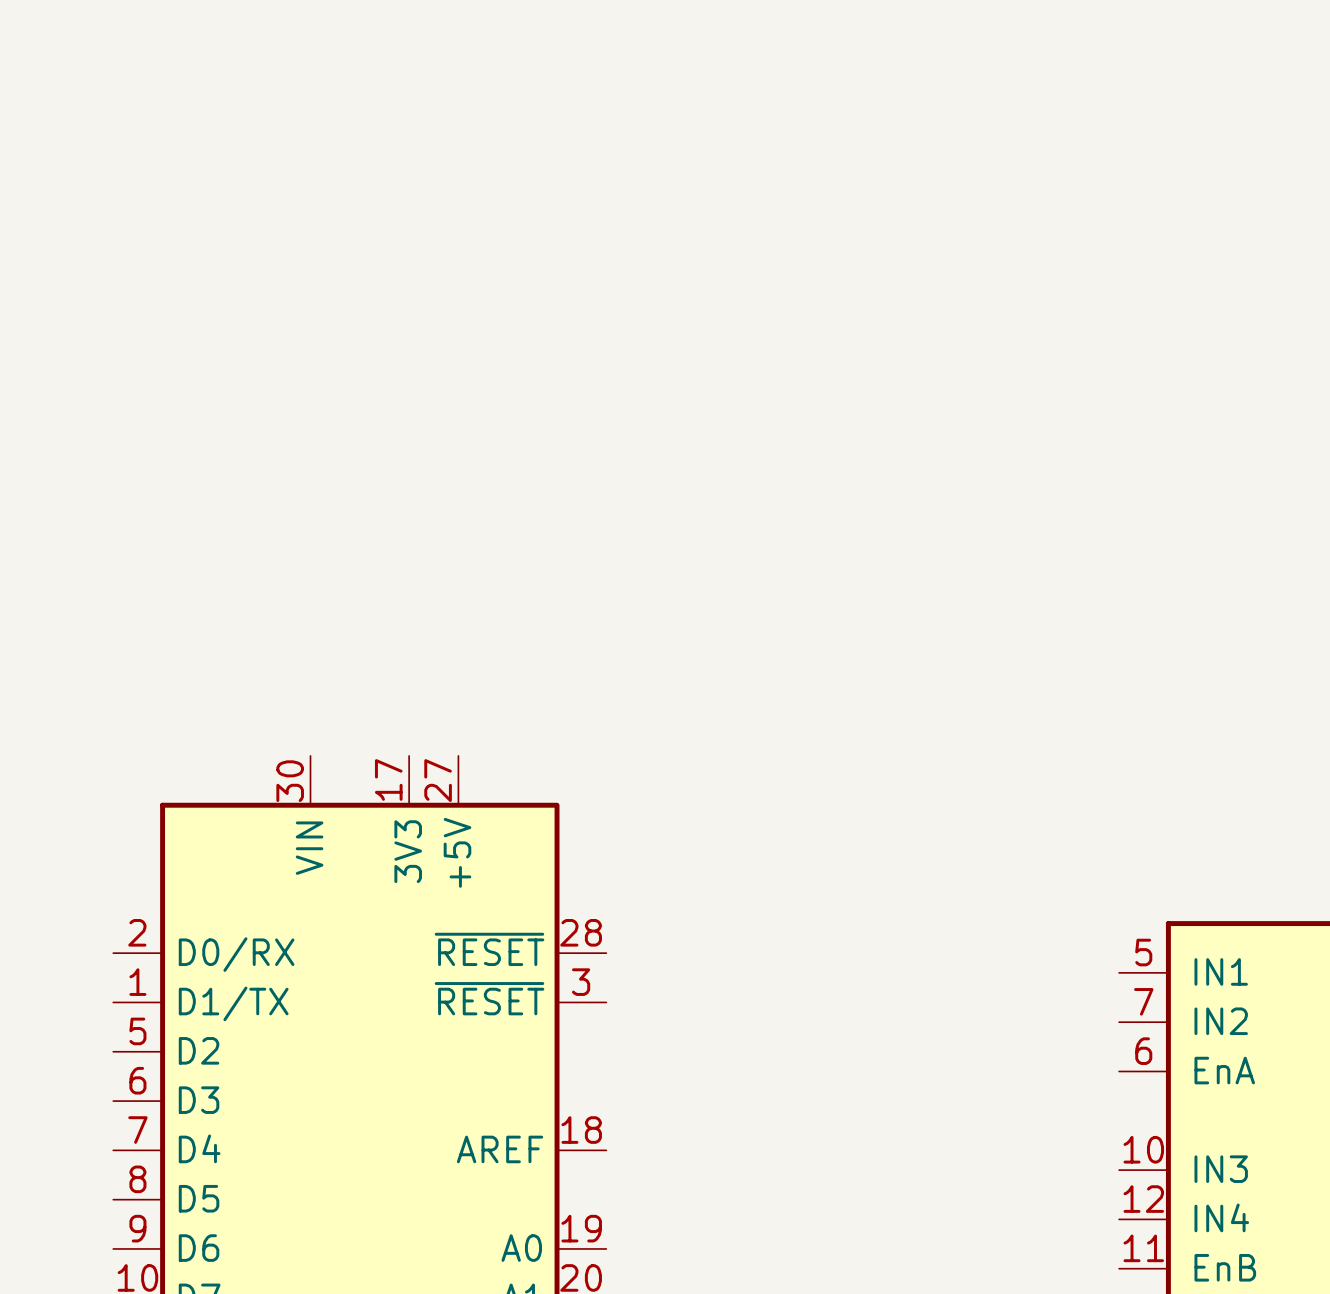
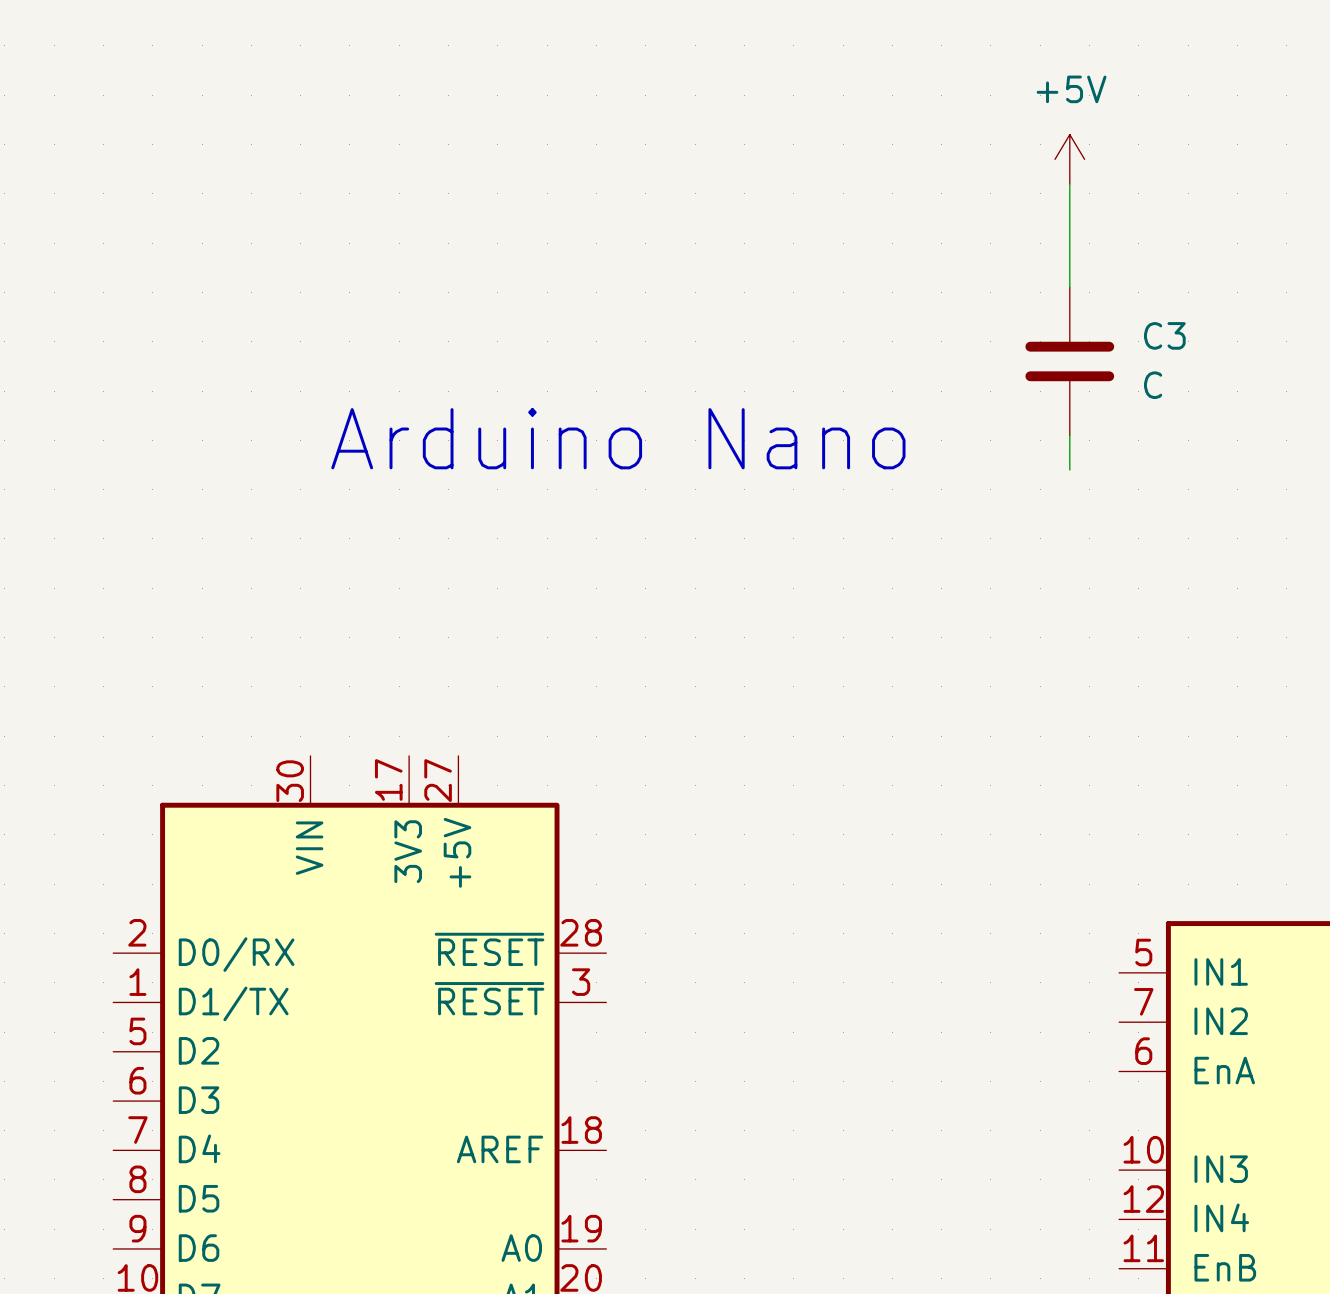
power symbol: none -> +5V (1069, 159)
wire: none -> (1069, 183) (1069, 287)
C3: none -> C (1069, 361)
wire: none -> (1069, 435) (1069, 469)
text: none -> Arduino Nano (618, 438)

